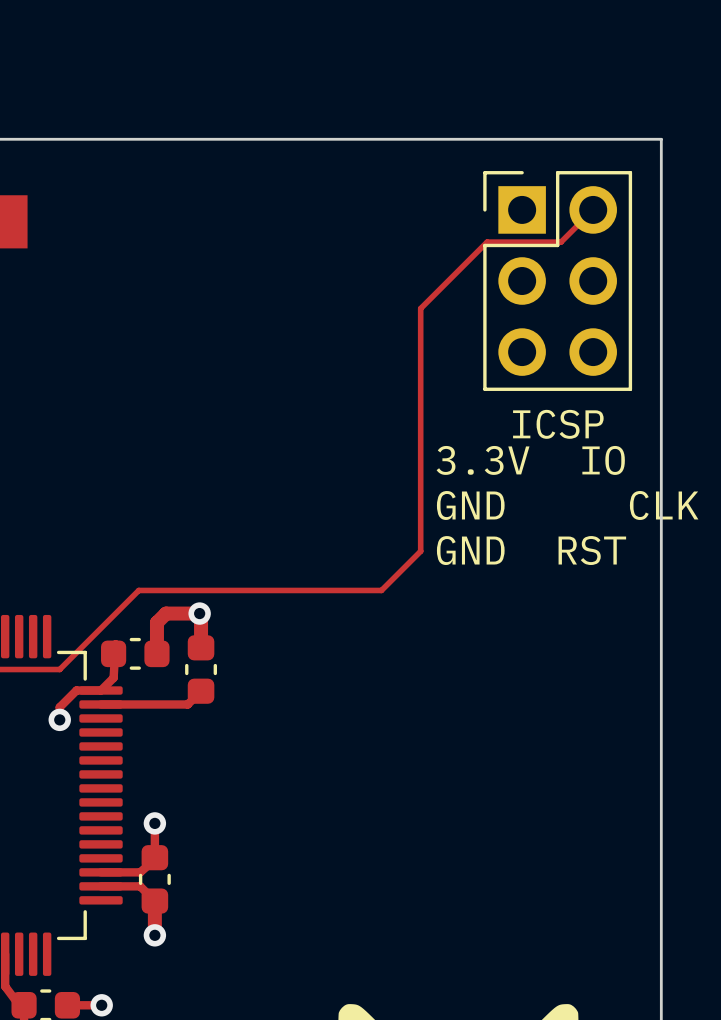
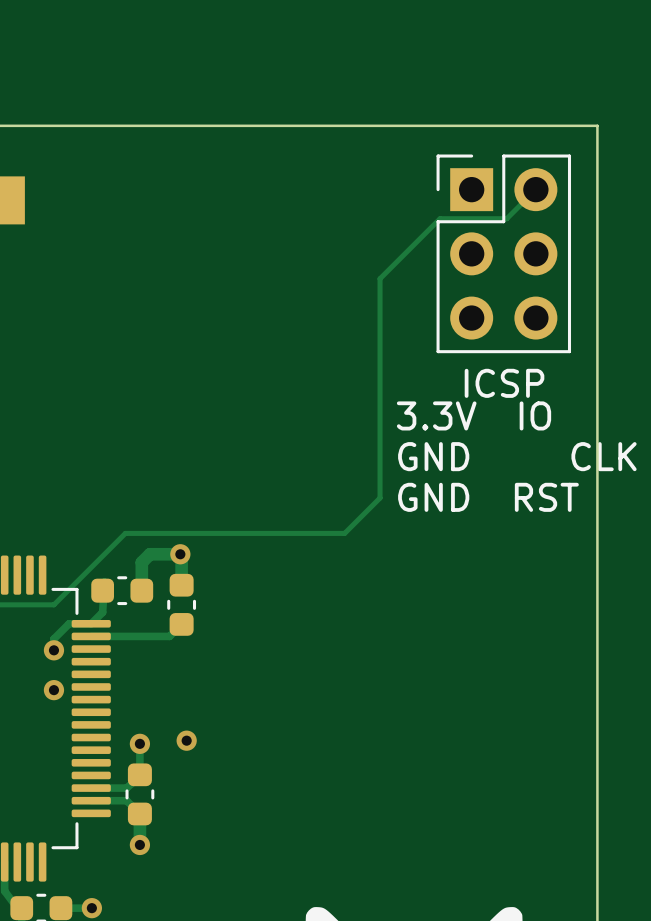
via: none -> (53, 690)
via: none -> (186, 740)

